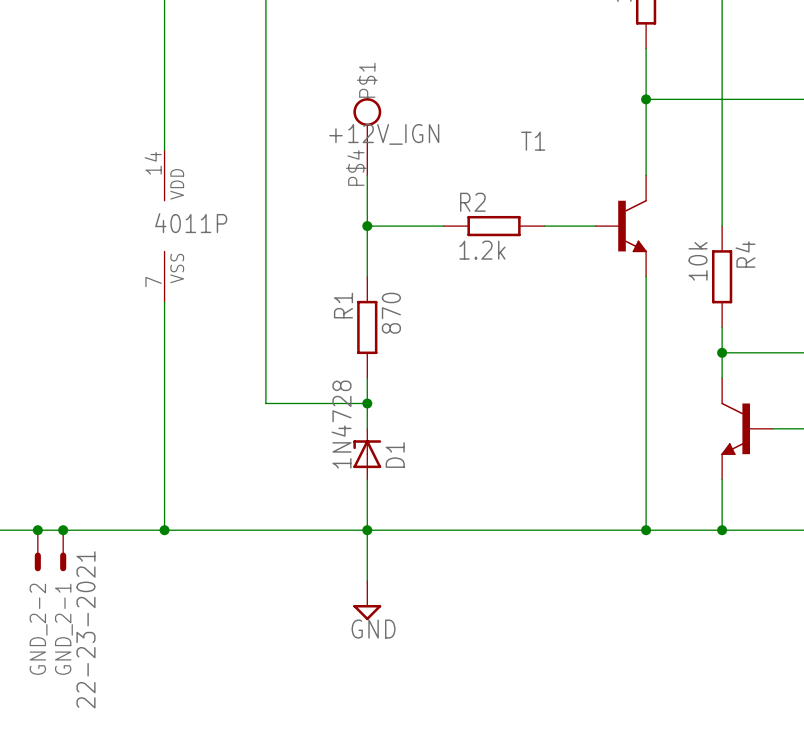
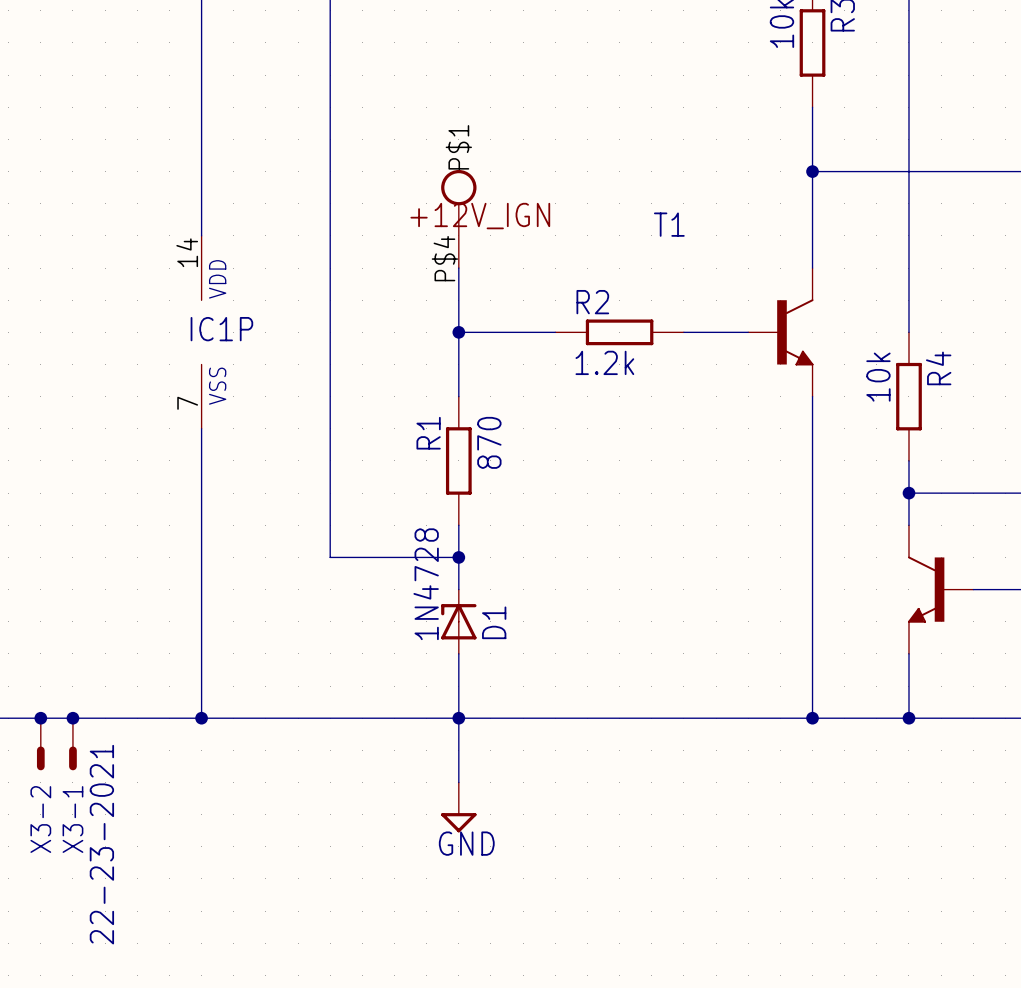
4011P name: 4011P (191, 223) -> IC1P (221, 329)
GND_2-2 name: GND_2-2 (38, 629) -> X3-2 (40, 819)
GND_2-1 name: GND_2-1 (63, 629) -> X3-1 (72, 819)

